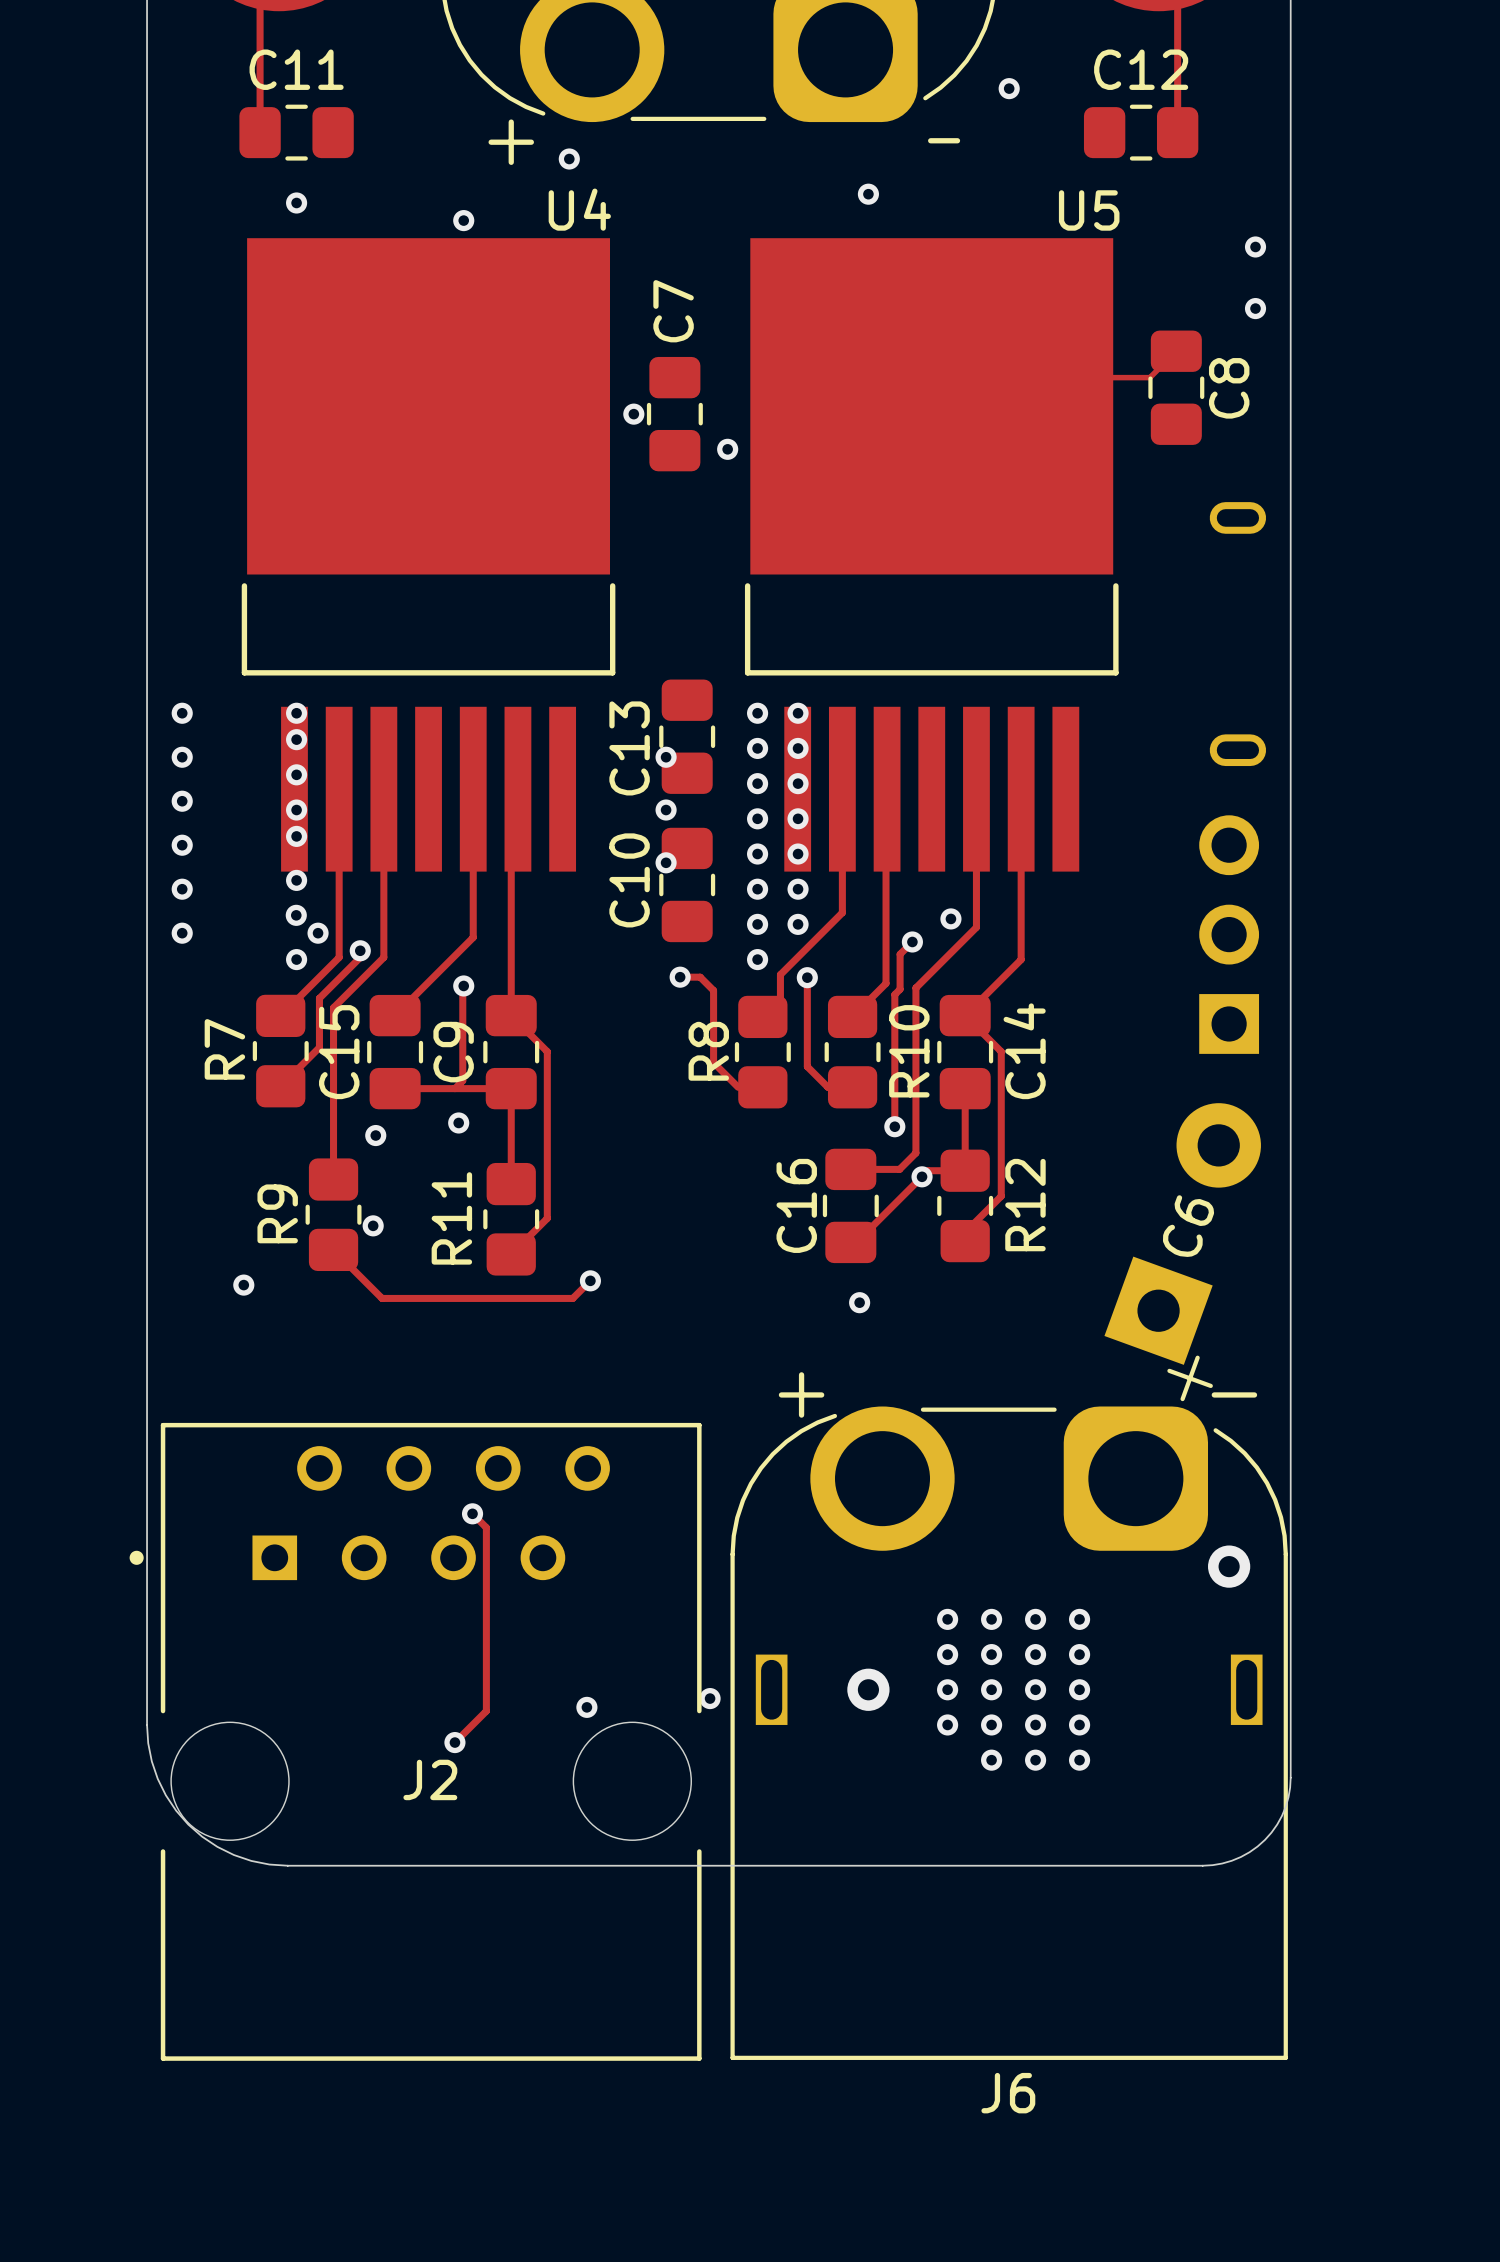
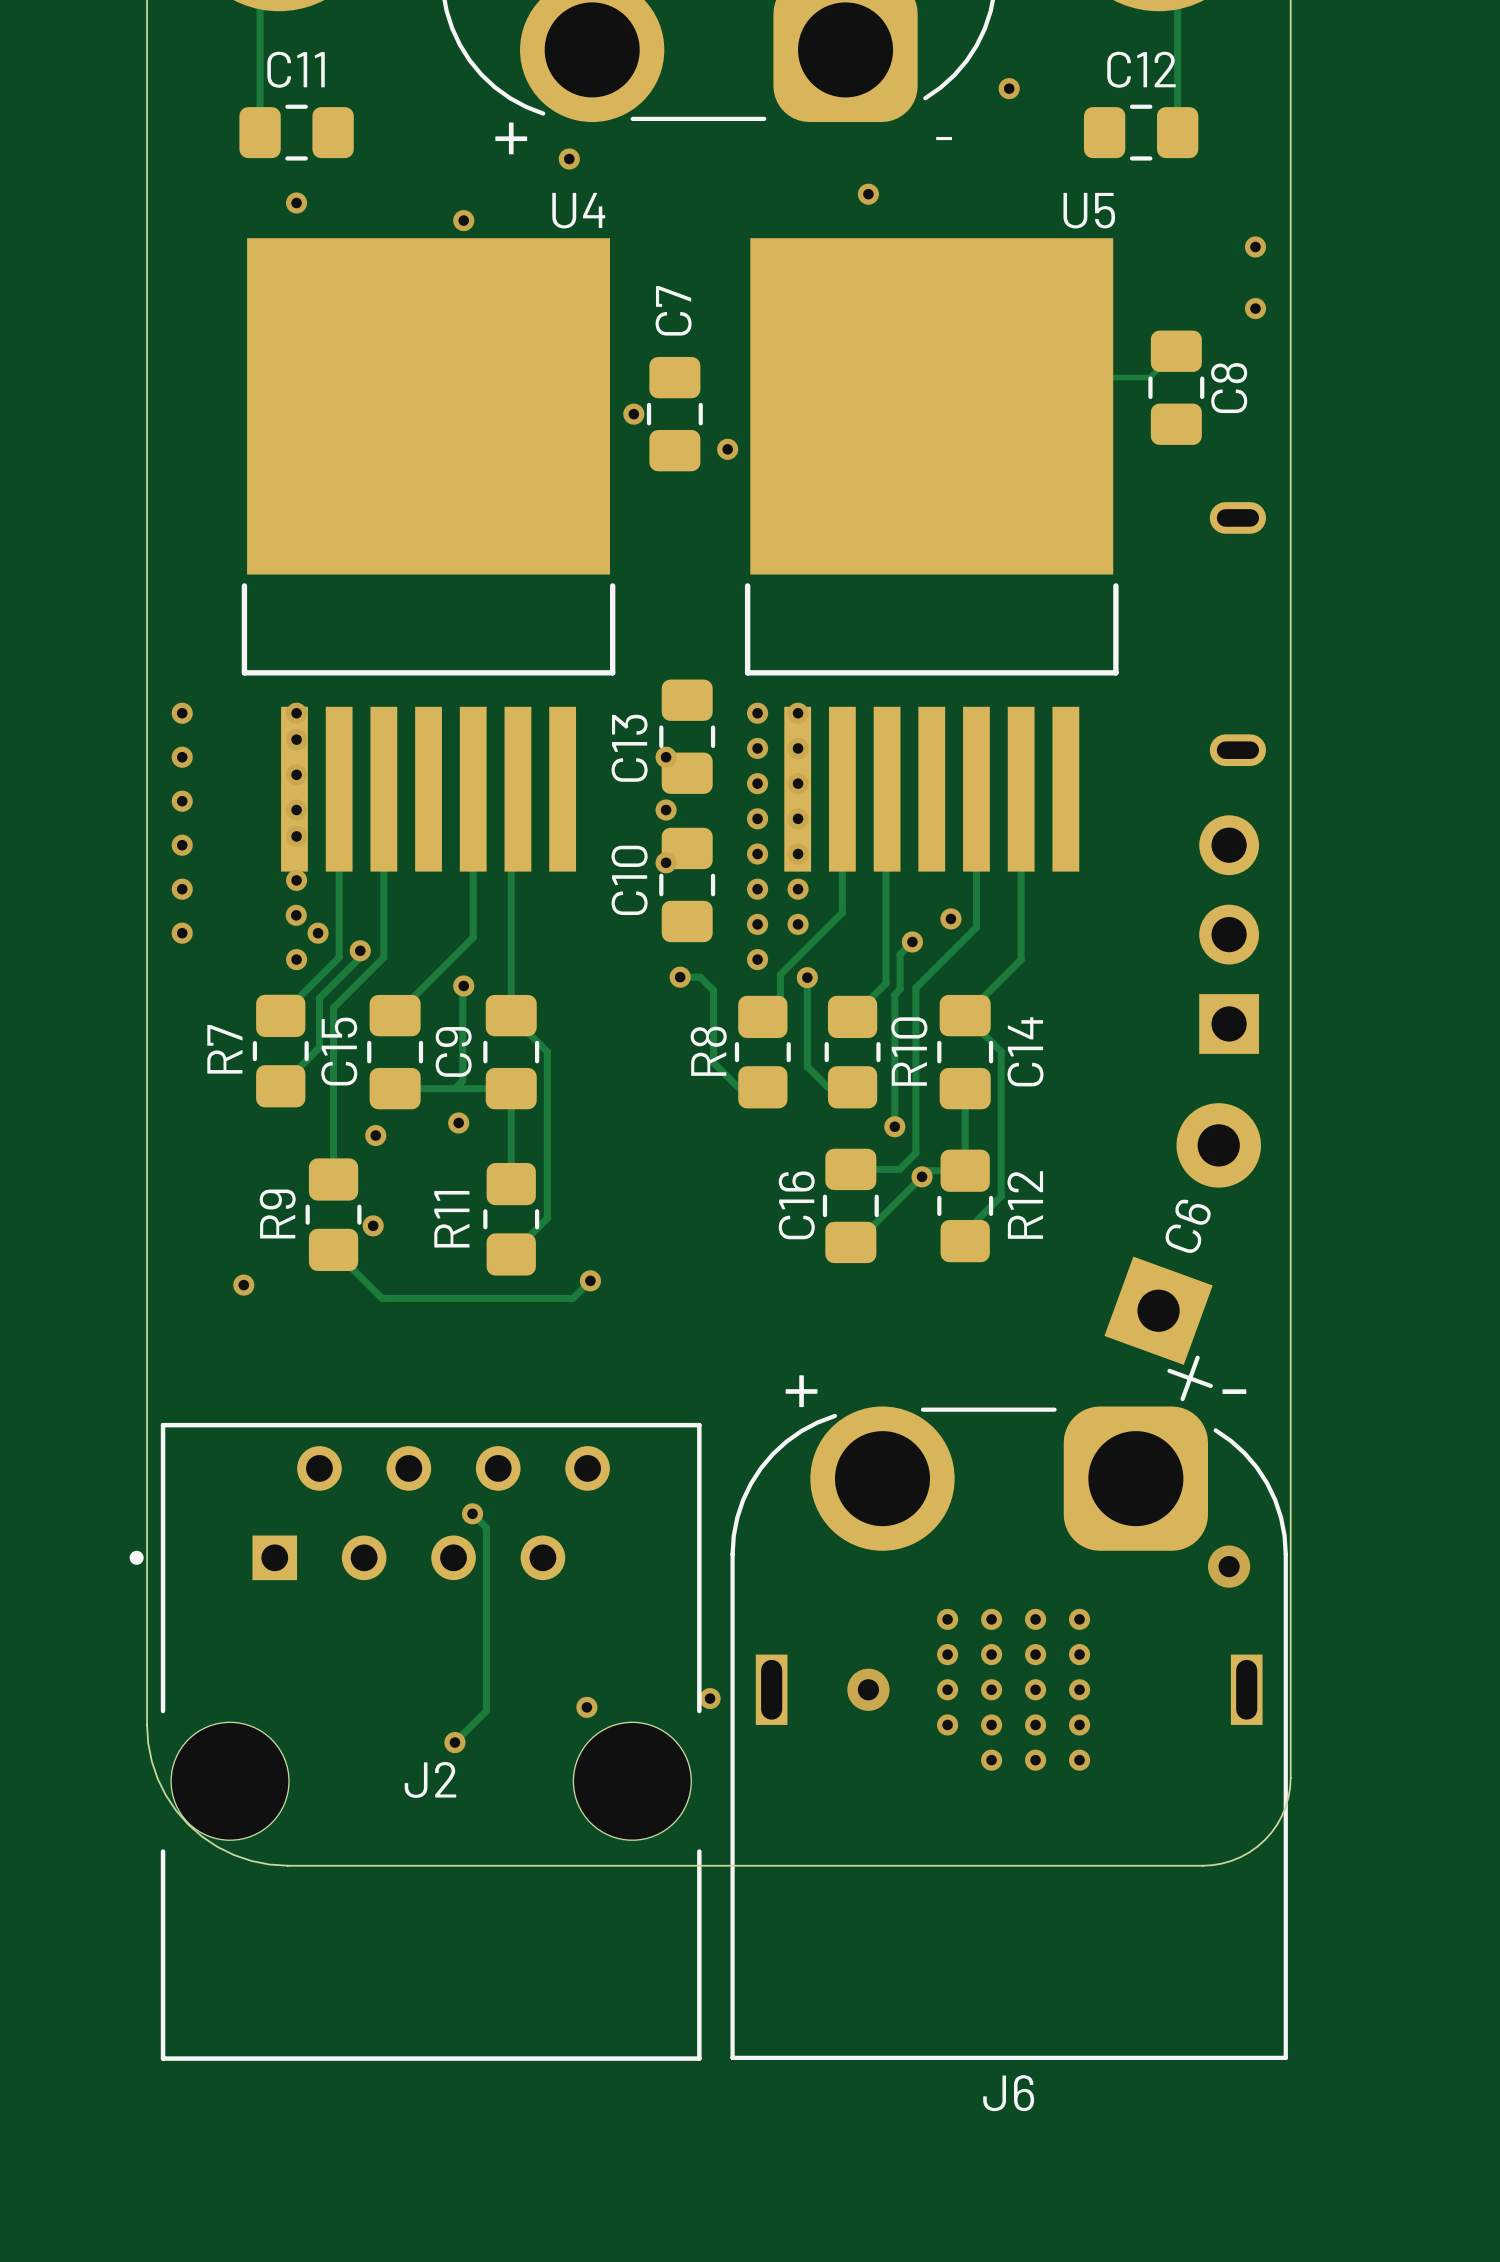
via: (859, 1302) -> none

